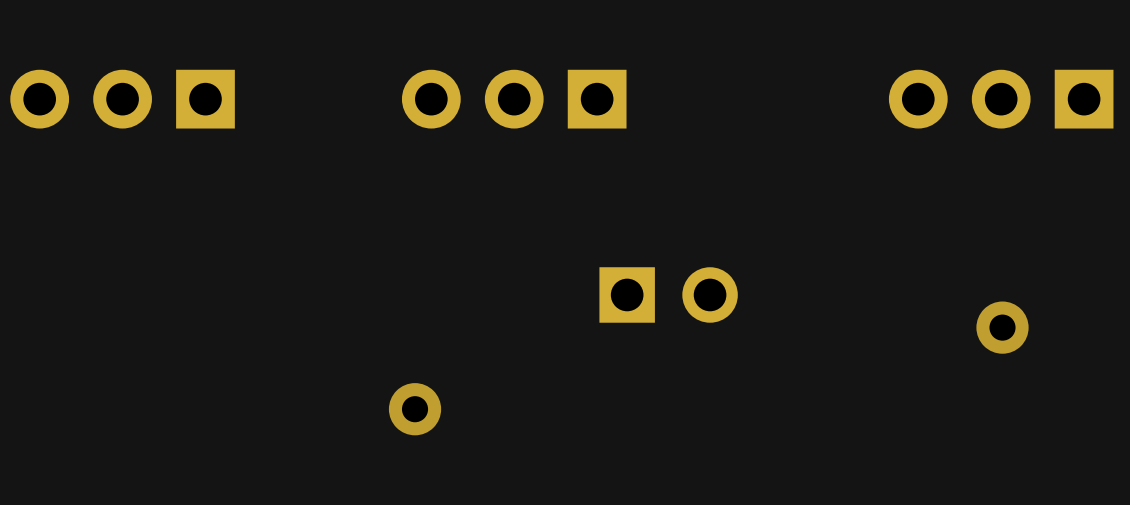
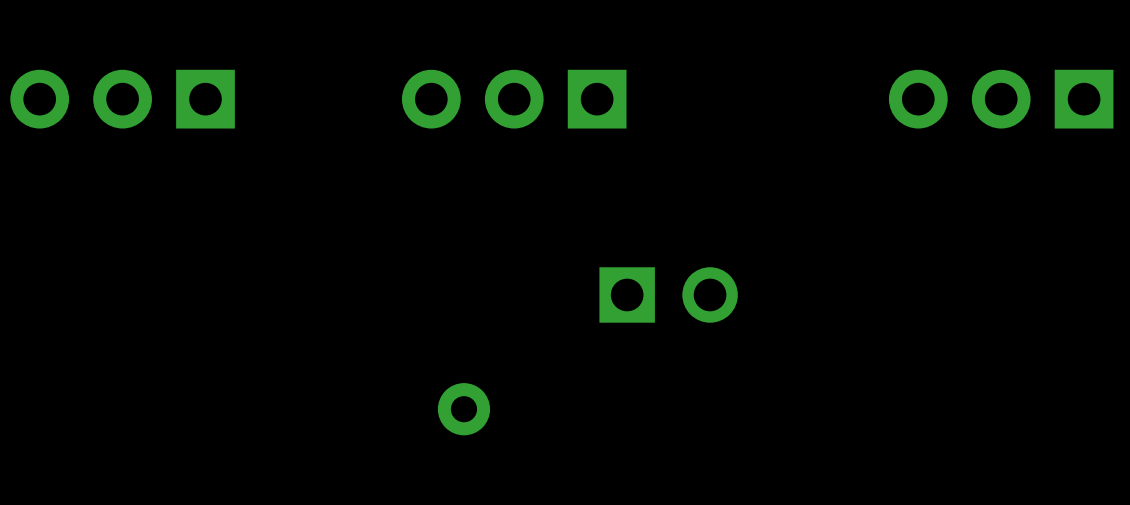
via: (1002, 327) -> none
via position: (415, 409) -> (463, 409)

